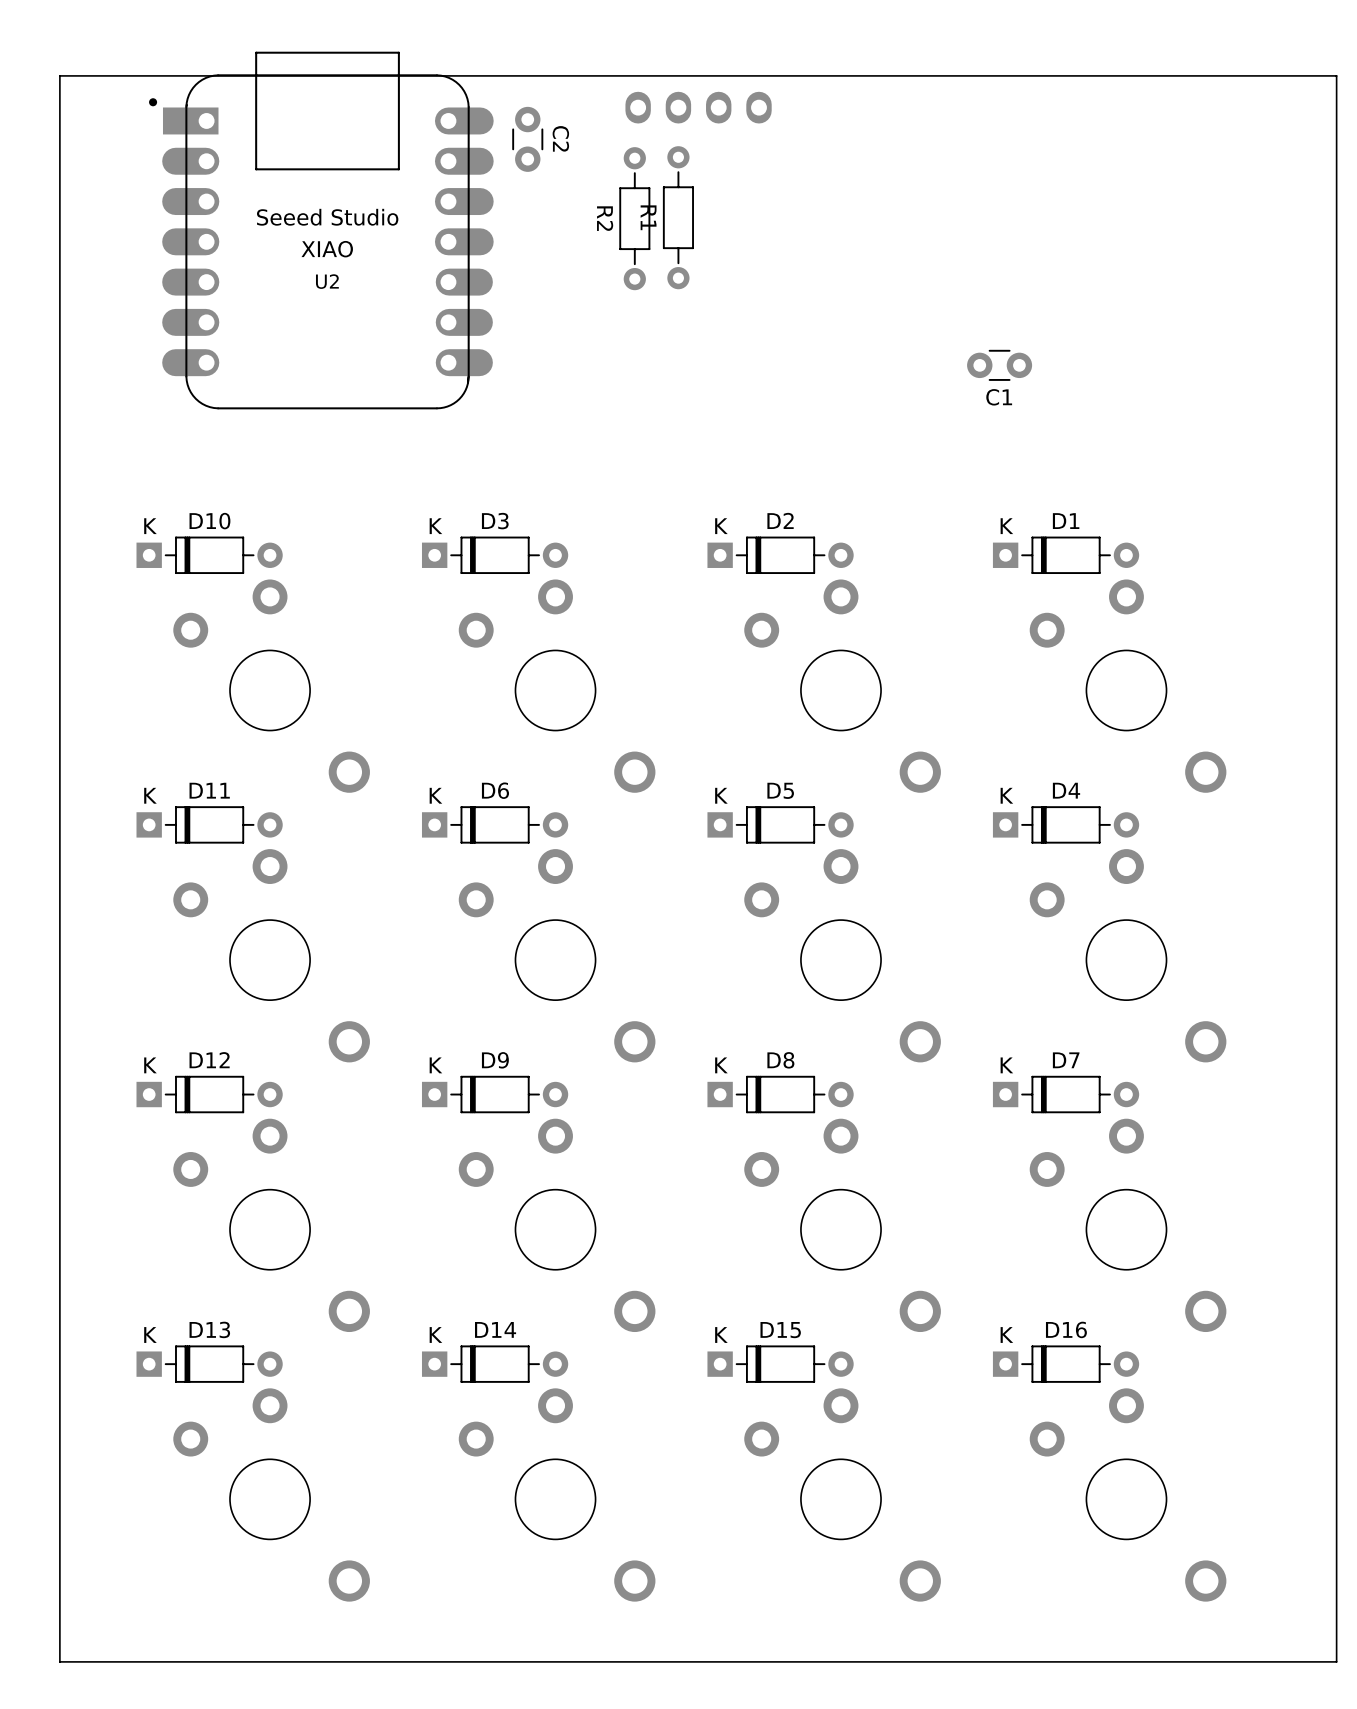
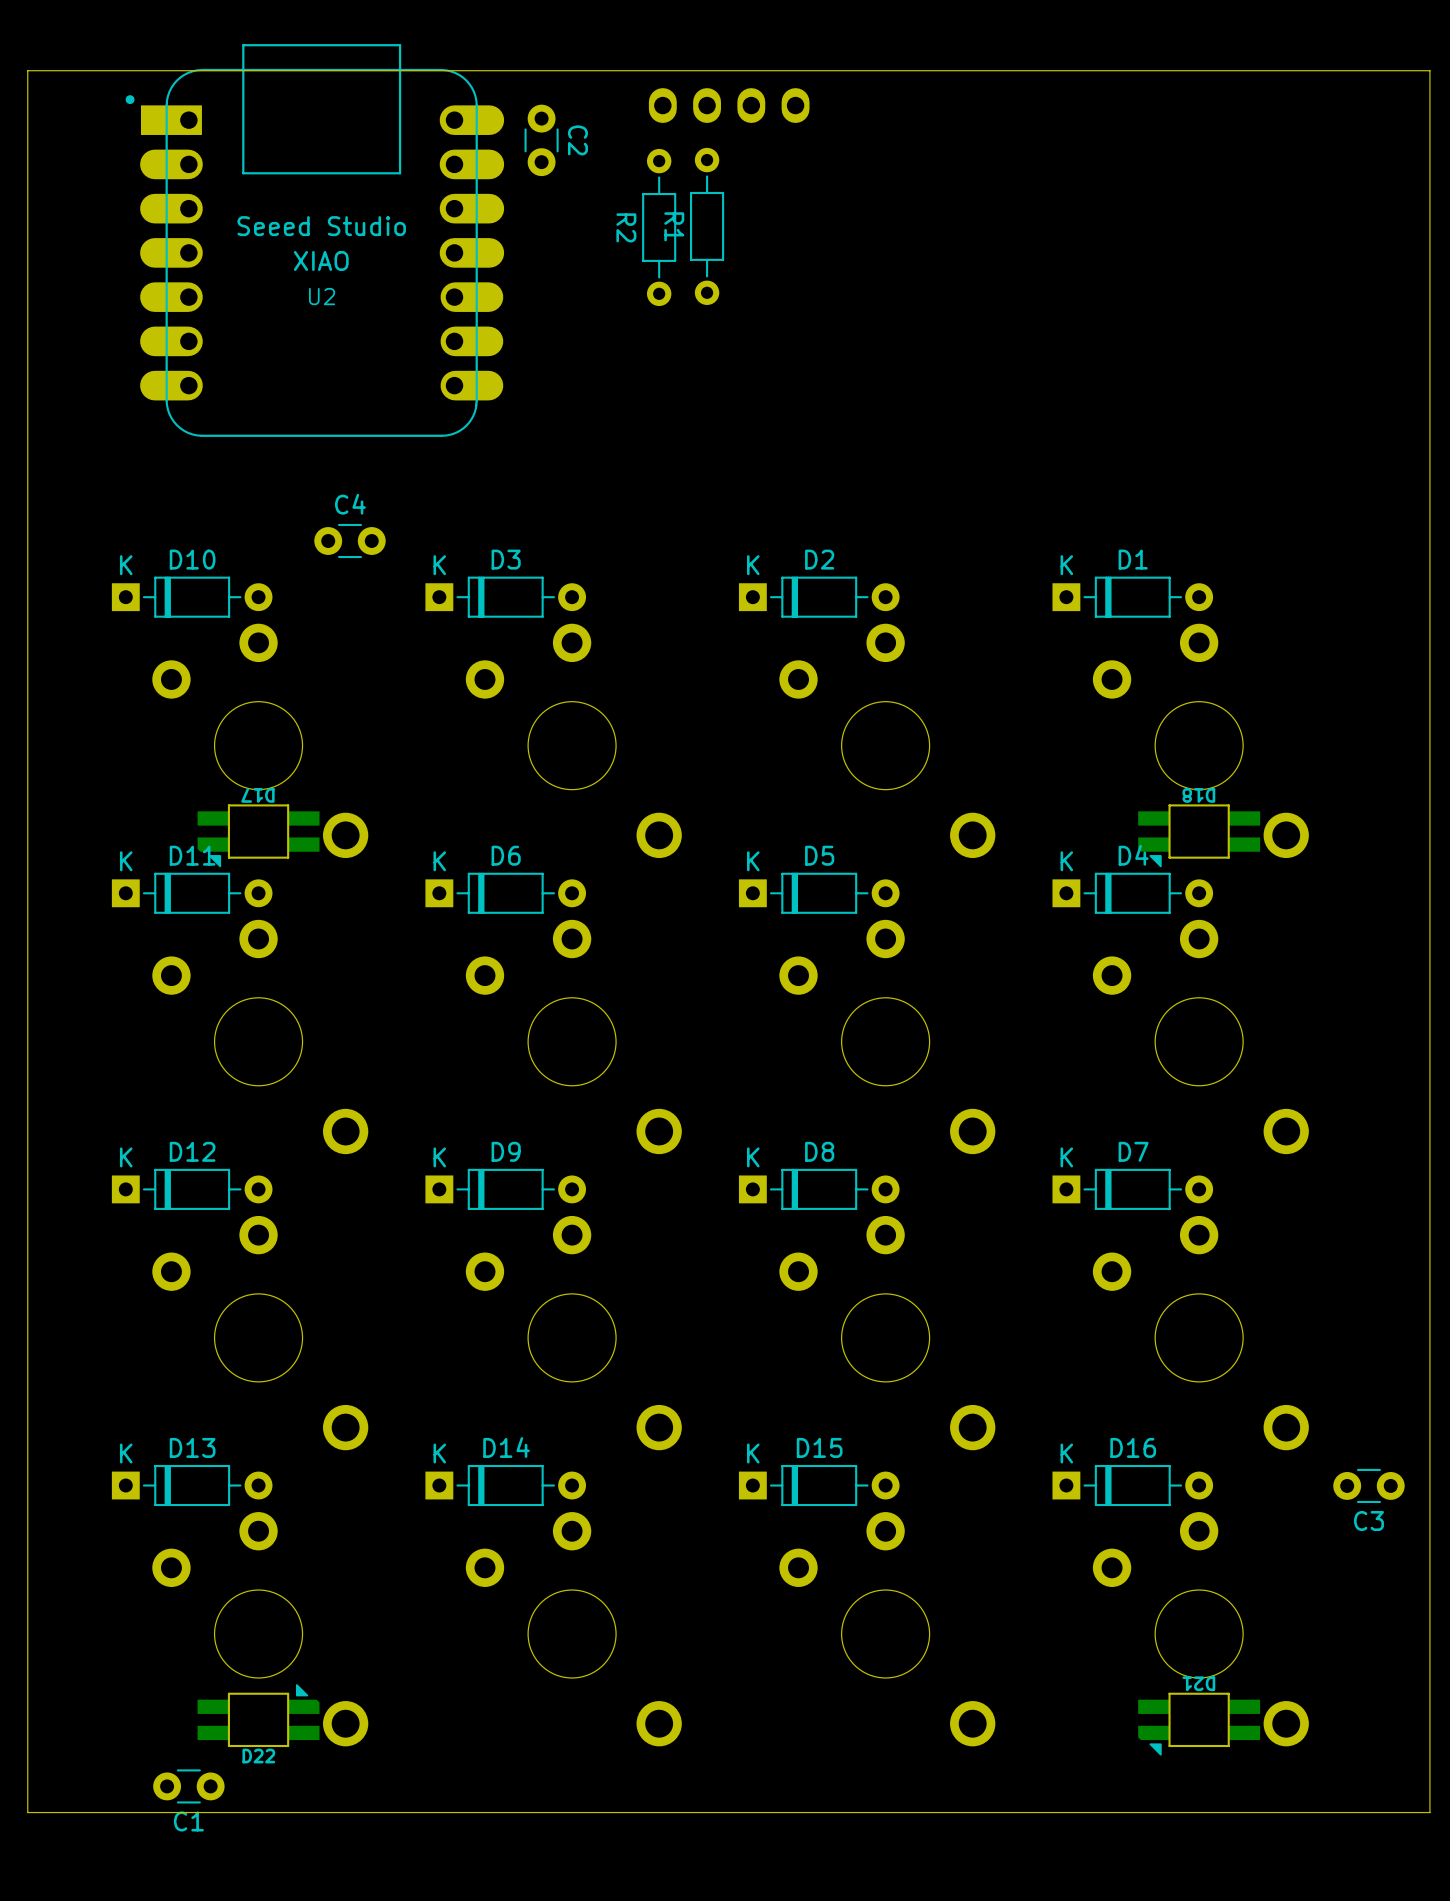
C1 position: (999, 365) -> (188, 1786)
C4: none -> (349, 541)
D17: none -> (258, 835)
D18: none -> (1199, 835)
C3: none -> (1368, 1485)
D22: none -> (258, 1715)
D21: none -> (1199, 1724)

